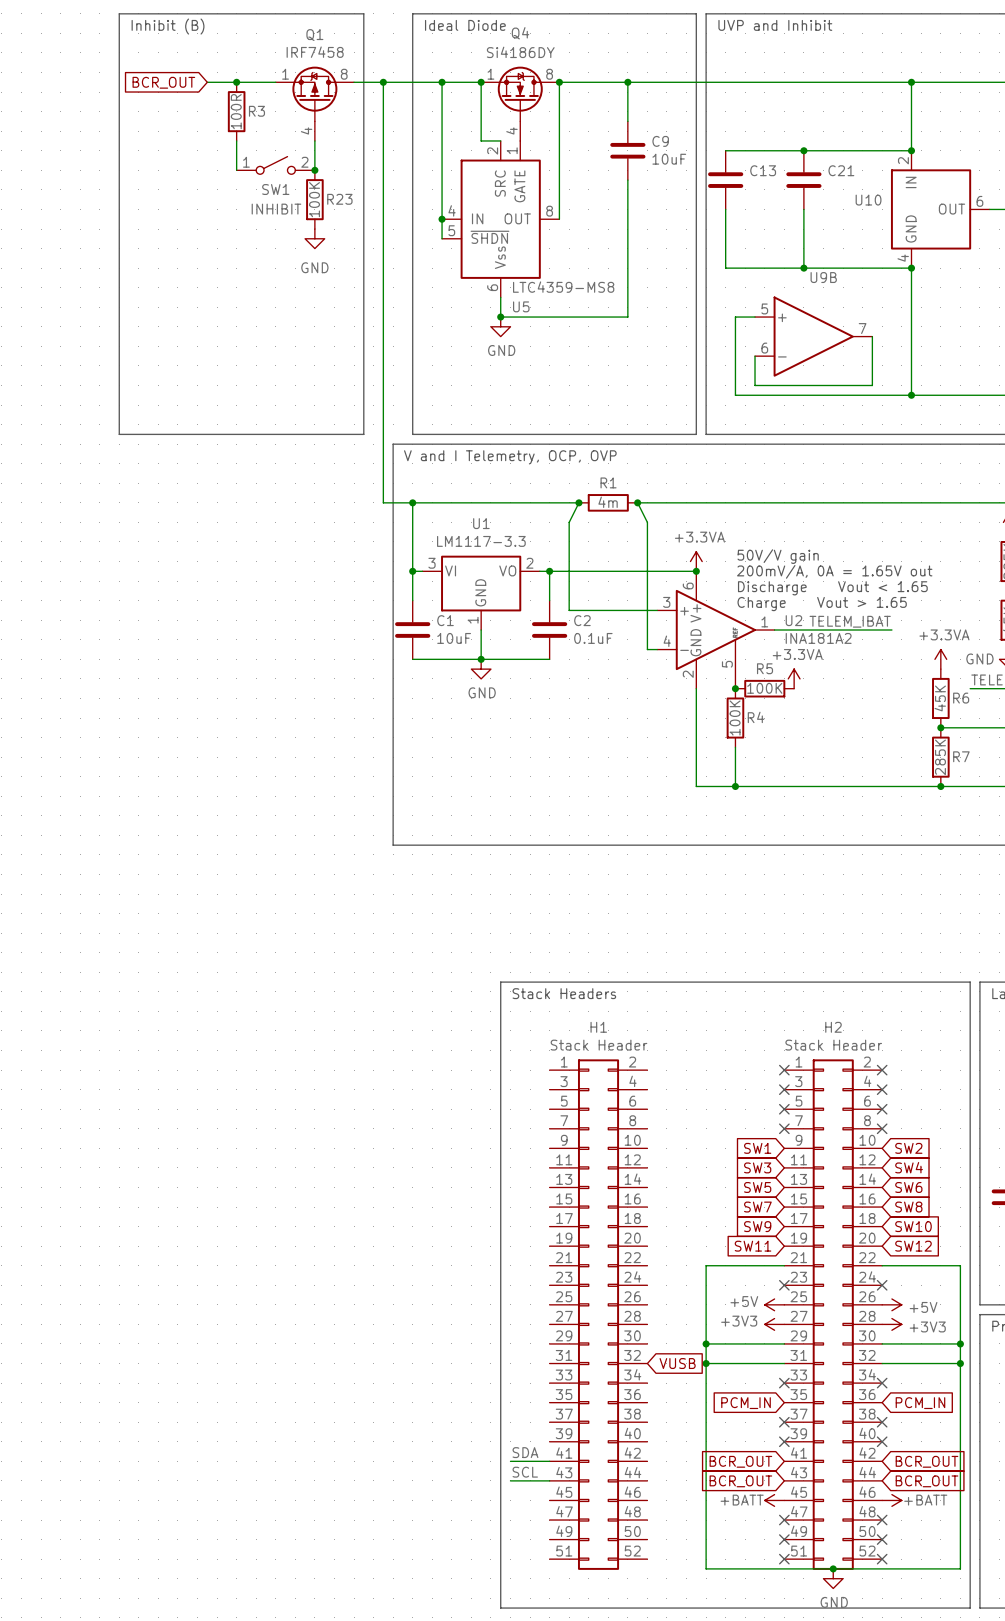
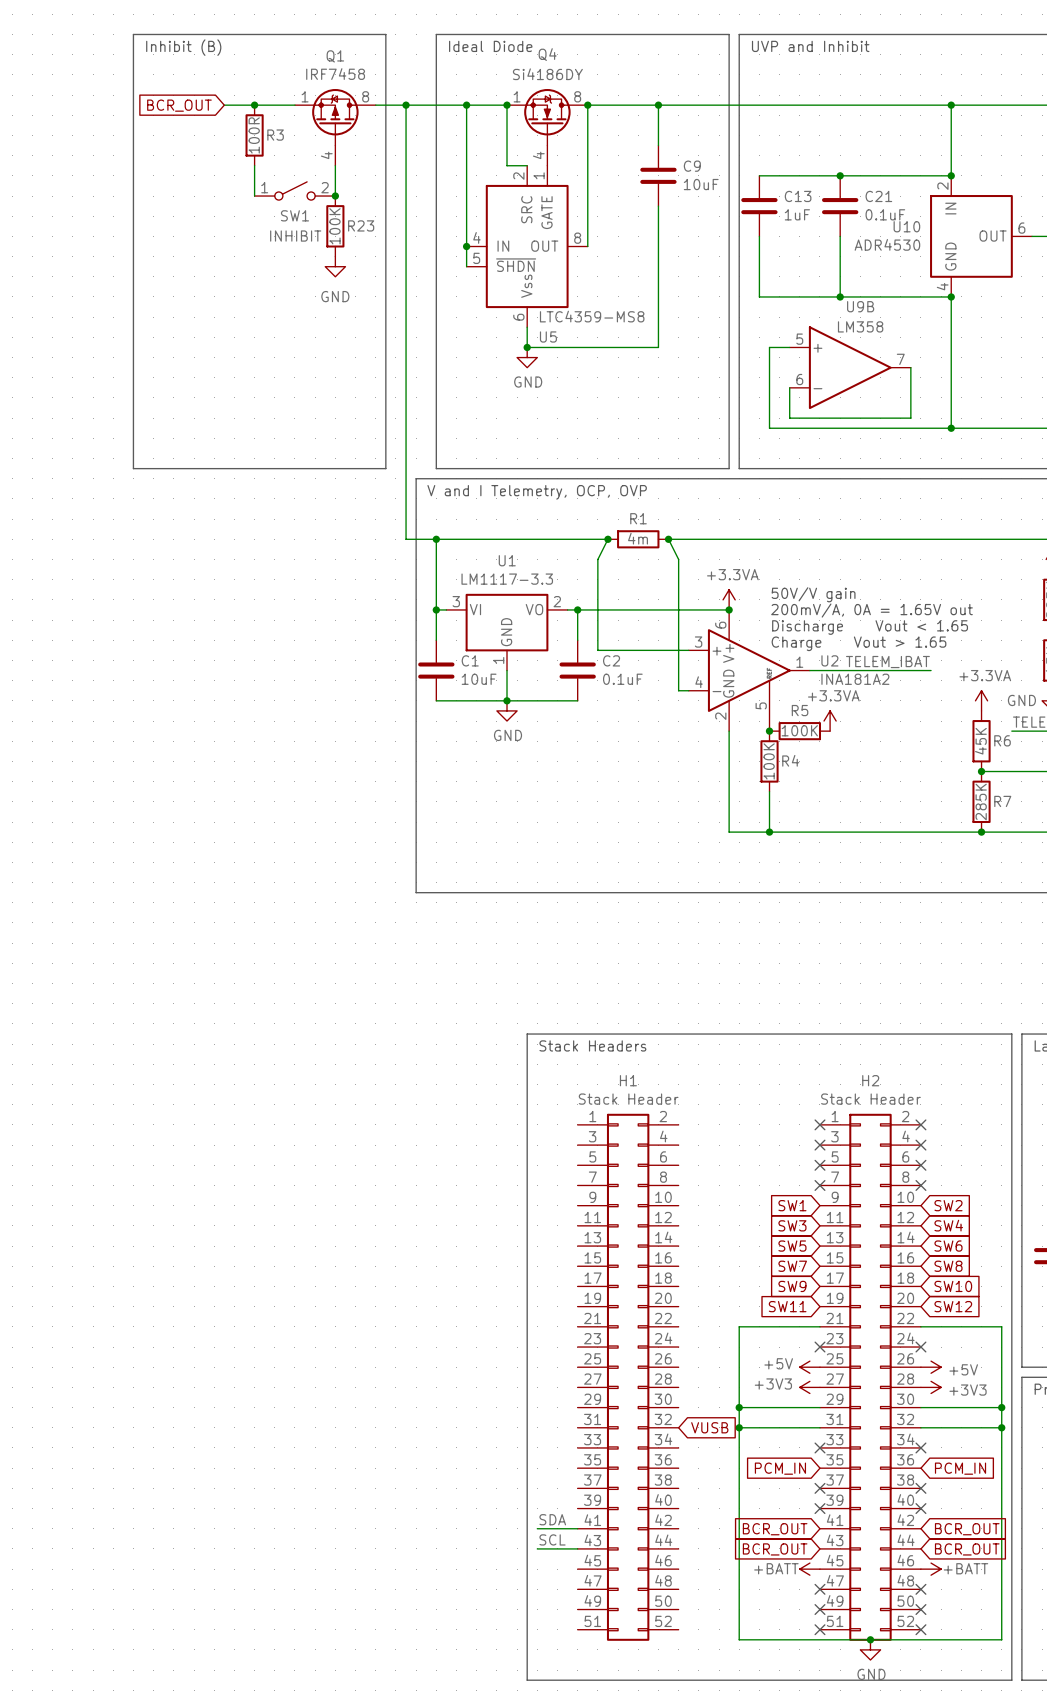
C13 value: none -> 1uF (797, 214)
C21 value: none -> 0.1uF (885, 214)
U10 value: none -> ADR4530 (887, 244)
U9B value: none -> LM358 (860, 326)

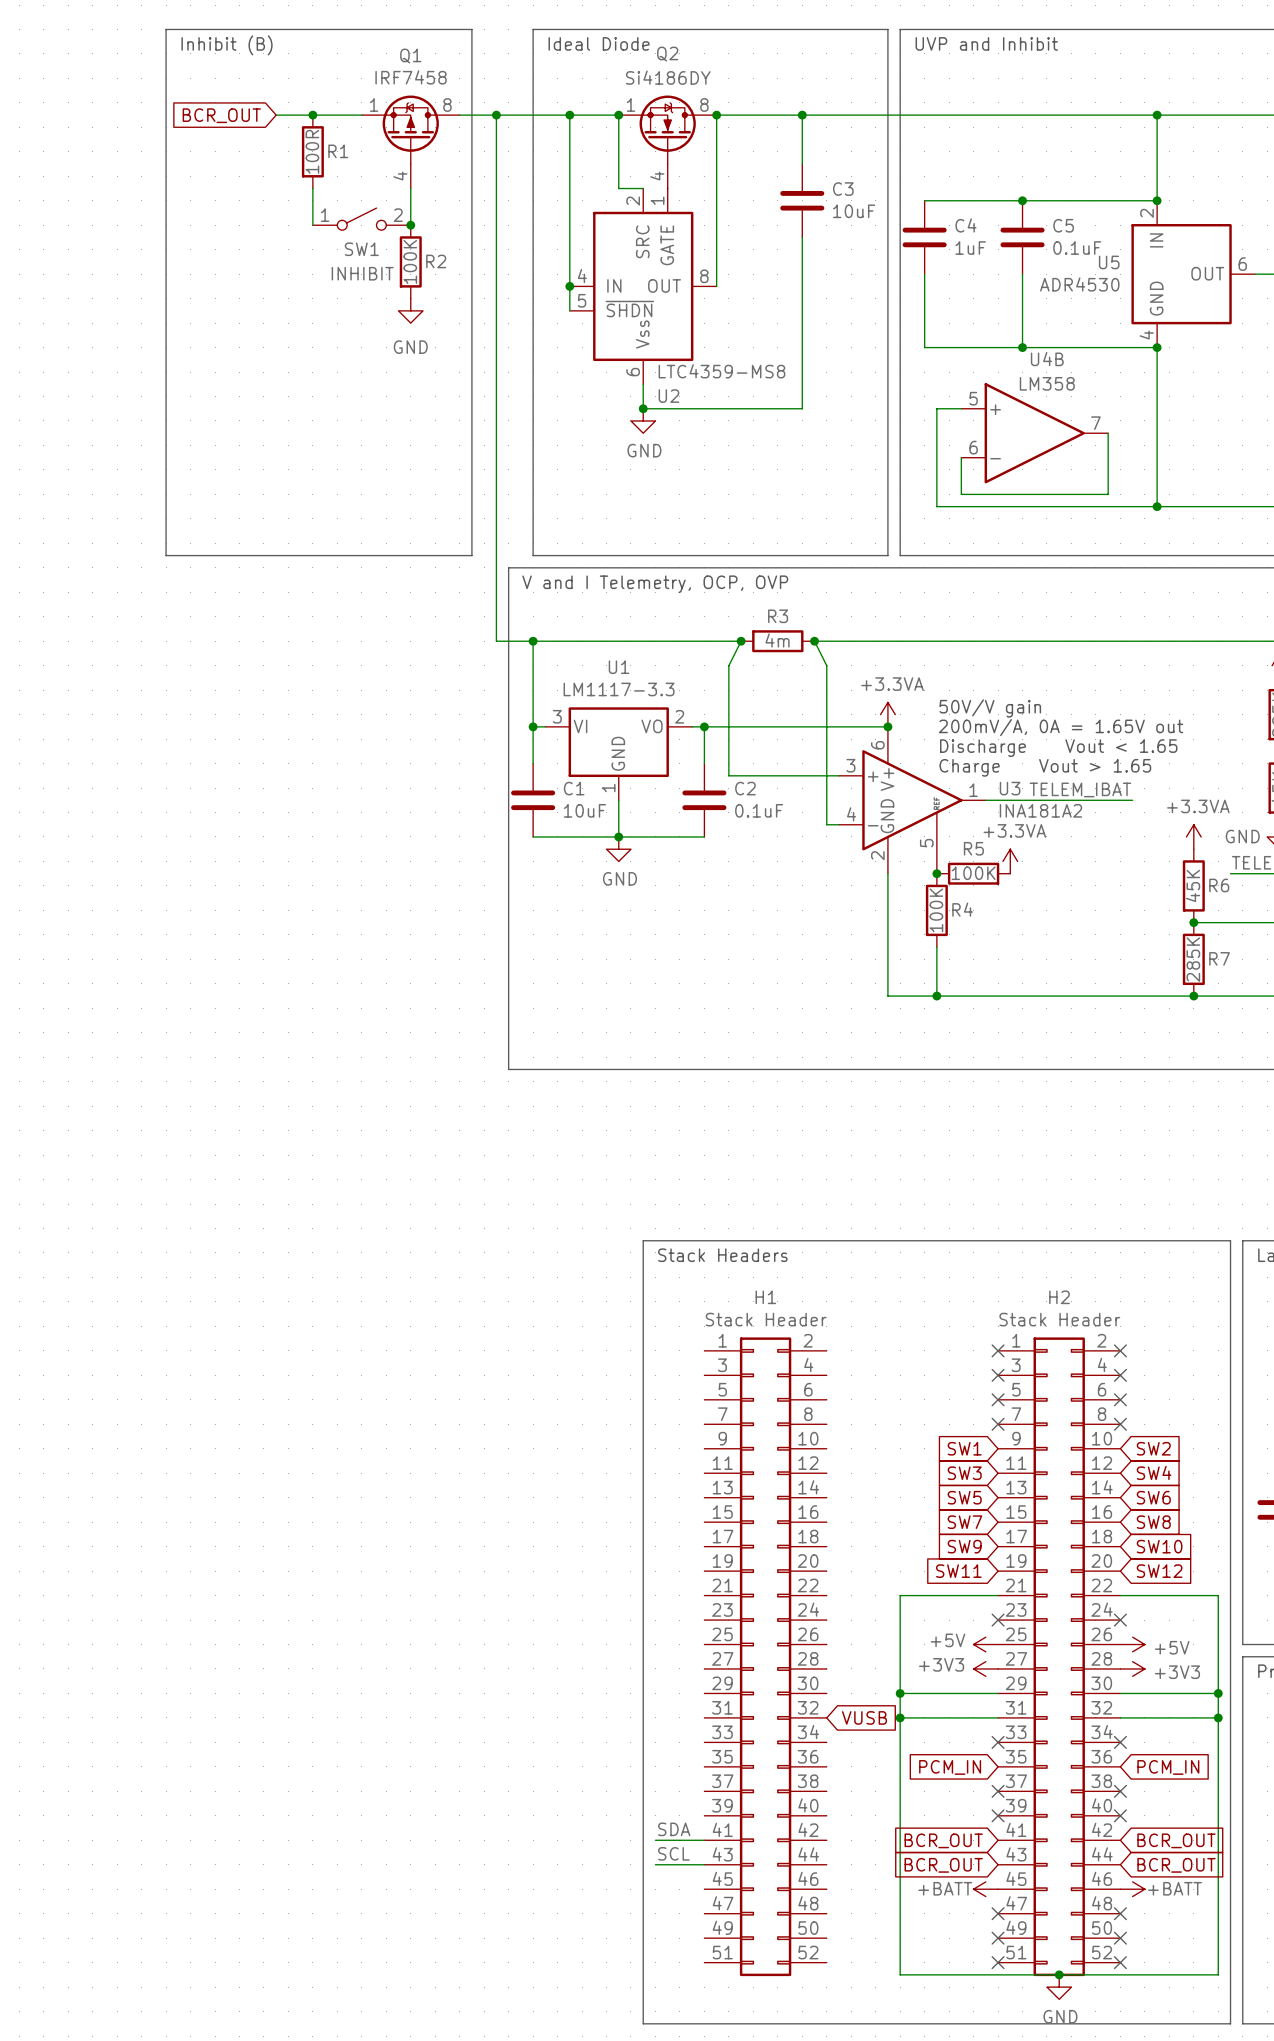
Q4 name: Q4 (547, 54) -> Q2 (667, 54)
R3 name: R3 (275, 135) -> R1 (338, 151)
C9 name: C9 (692, 166) -> C3 (843, 189)
C13 name: C13 (798, 196) -> C4 (965, 225)
C21 name: C21 (878, 196) -> C5 (1063, 225)
R23 name: R23 (361, 225) -> R2 (436, 261)
U10 name: U10 (906, 226) -> U5 (1109, 262)
U9B name: U9B (860, 306) -> U4B (1047, 359)
U5 name: U5 (548, 336) -> U2 (668, 396)
R1 name: R1 (638, 518) -> R3 (778, 616)
U2 name: U2 (829, 660) -> U3 (1010, 788)

